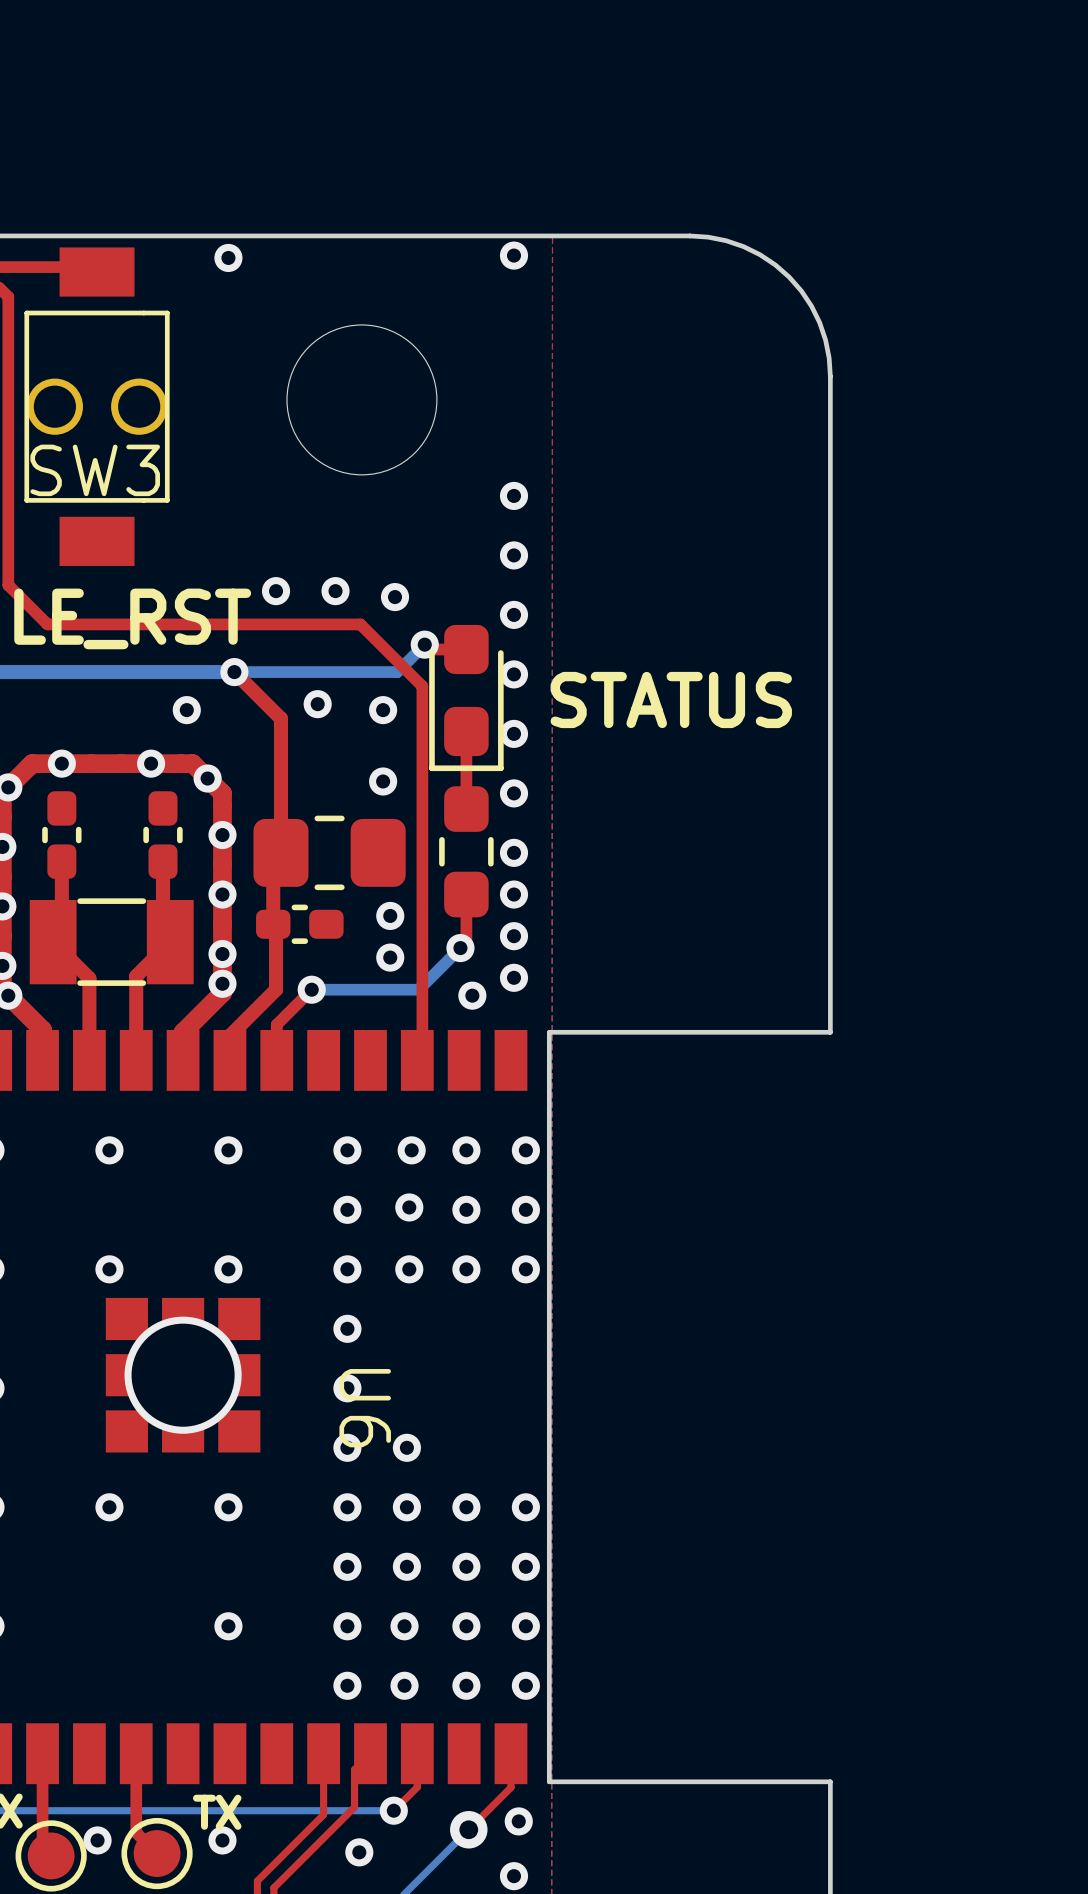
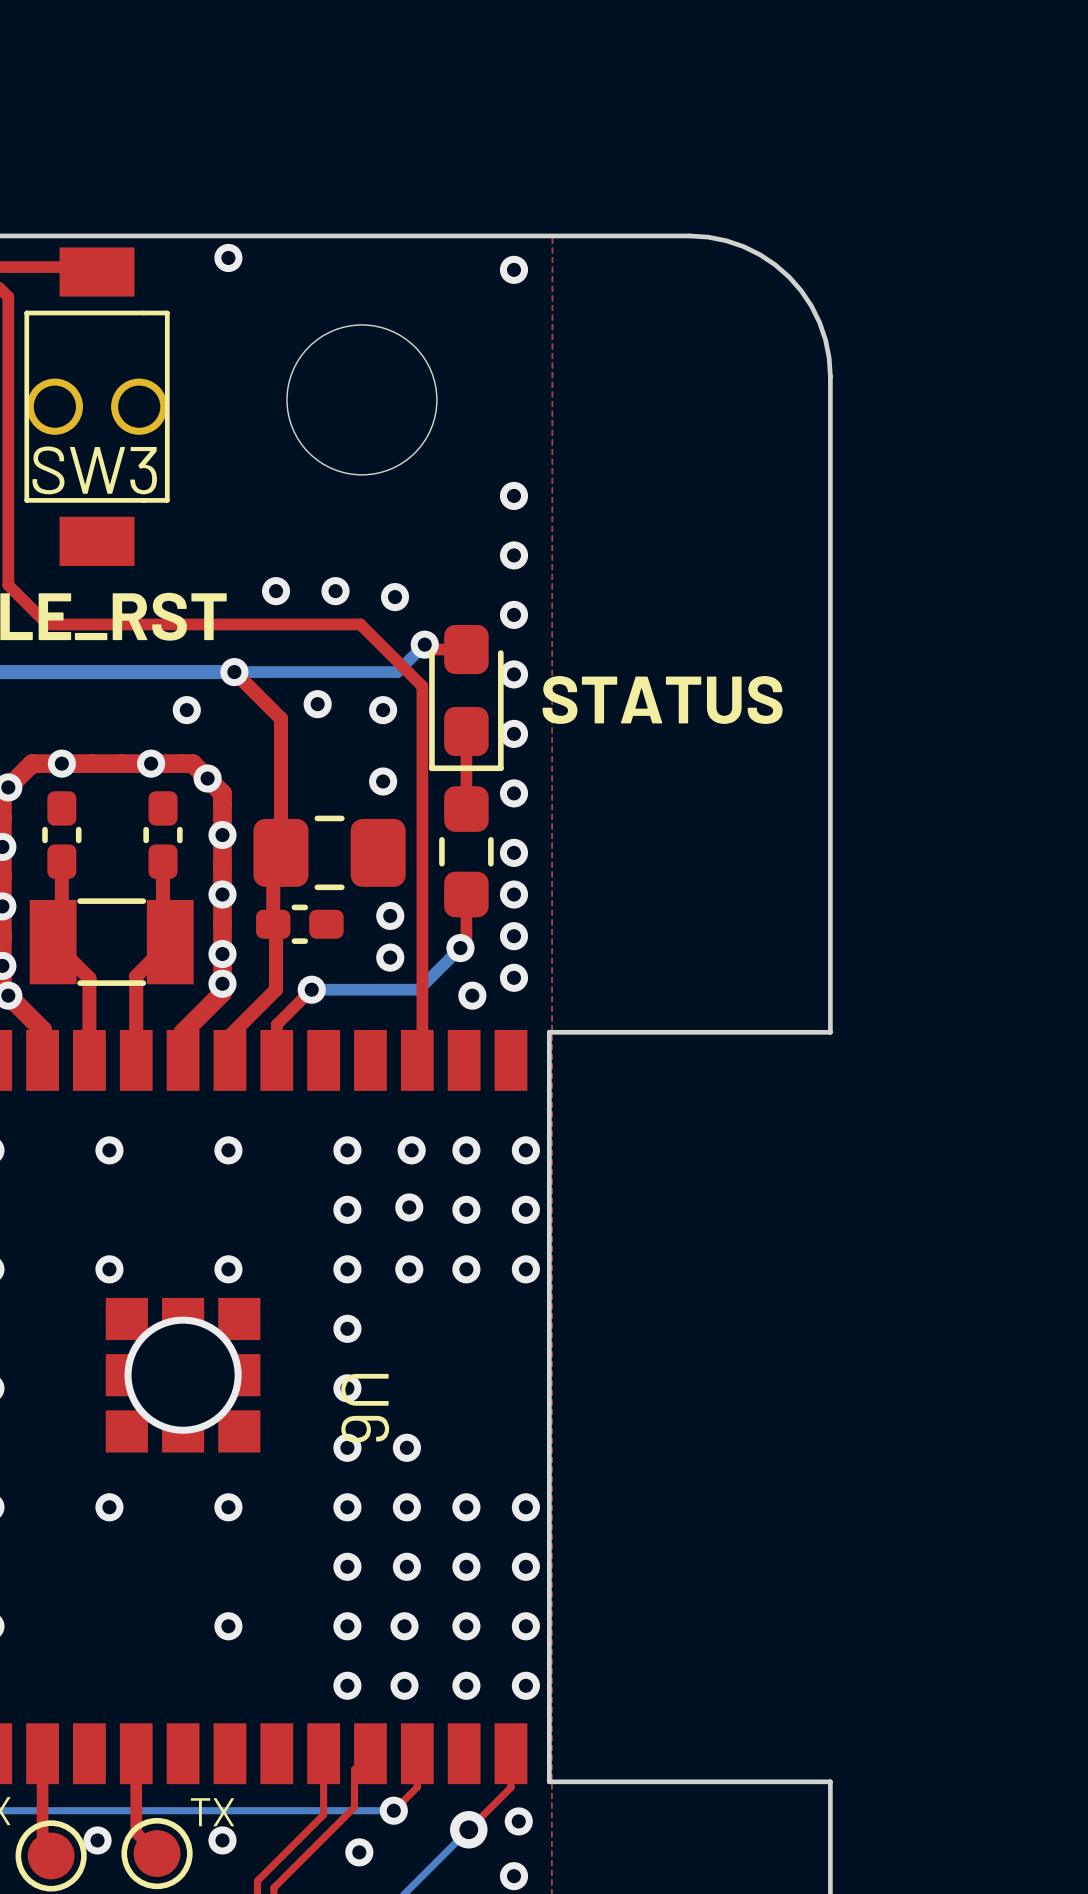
via position: (514, 255) -> (514, 269)

